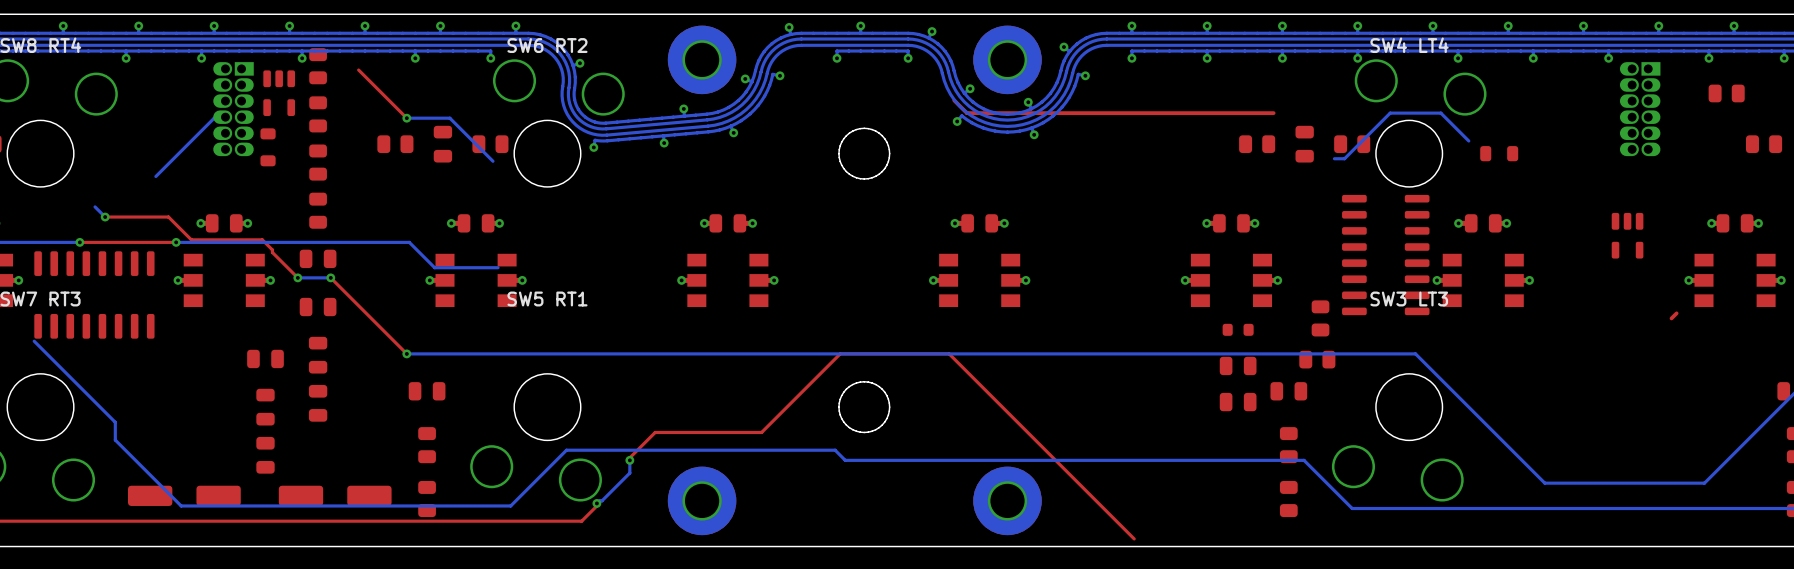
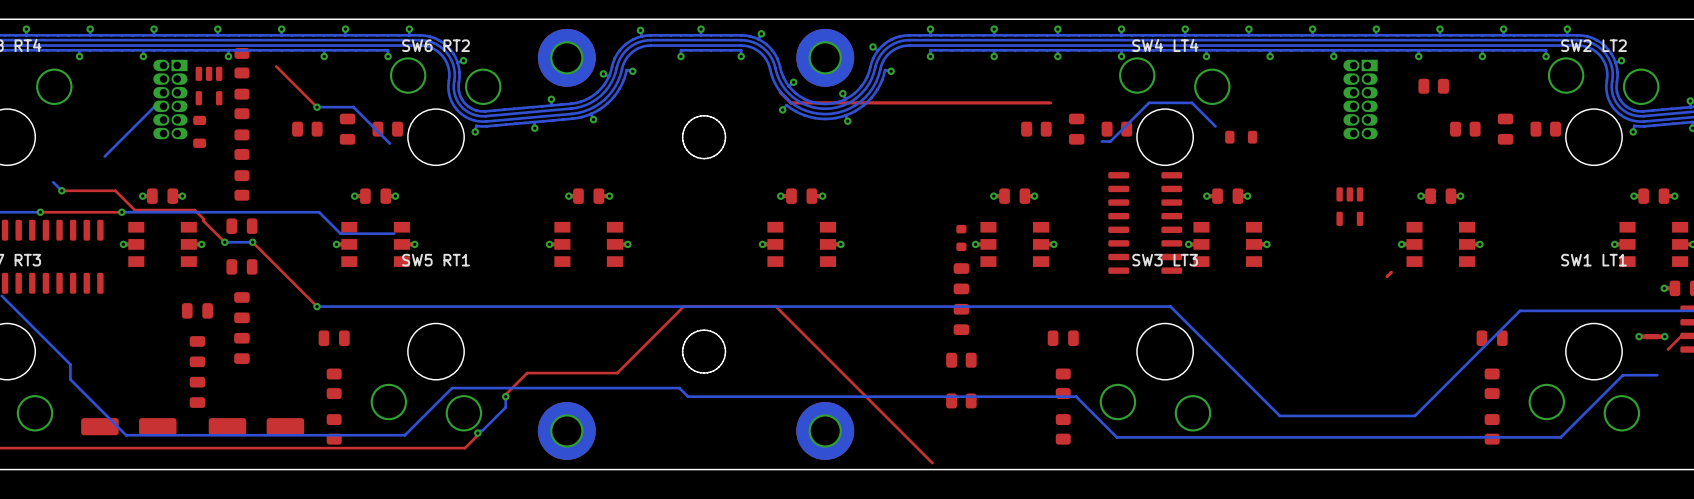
part: (1320, 318) -> none
part: none -> (961, 278)
part rotation: 0° (1238, 329) -> 90° clockwise (961, 237)
part position: (1238, 329) -> (961, 237)
part: (1317, 359) -> none
part: (1238, 365) -> none
part: none -> (961, 319)
part: (1238, 402) -> none
part: none -> (961, 360)
part: none -> (961, 400)

